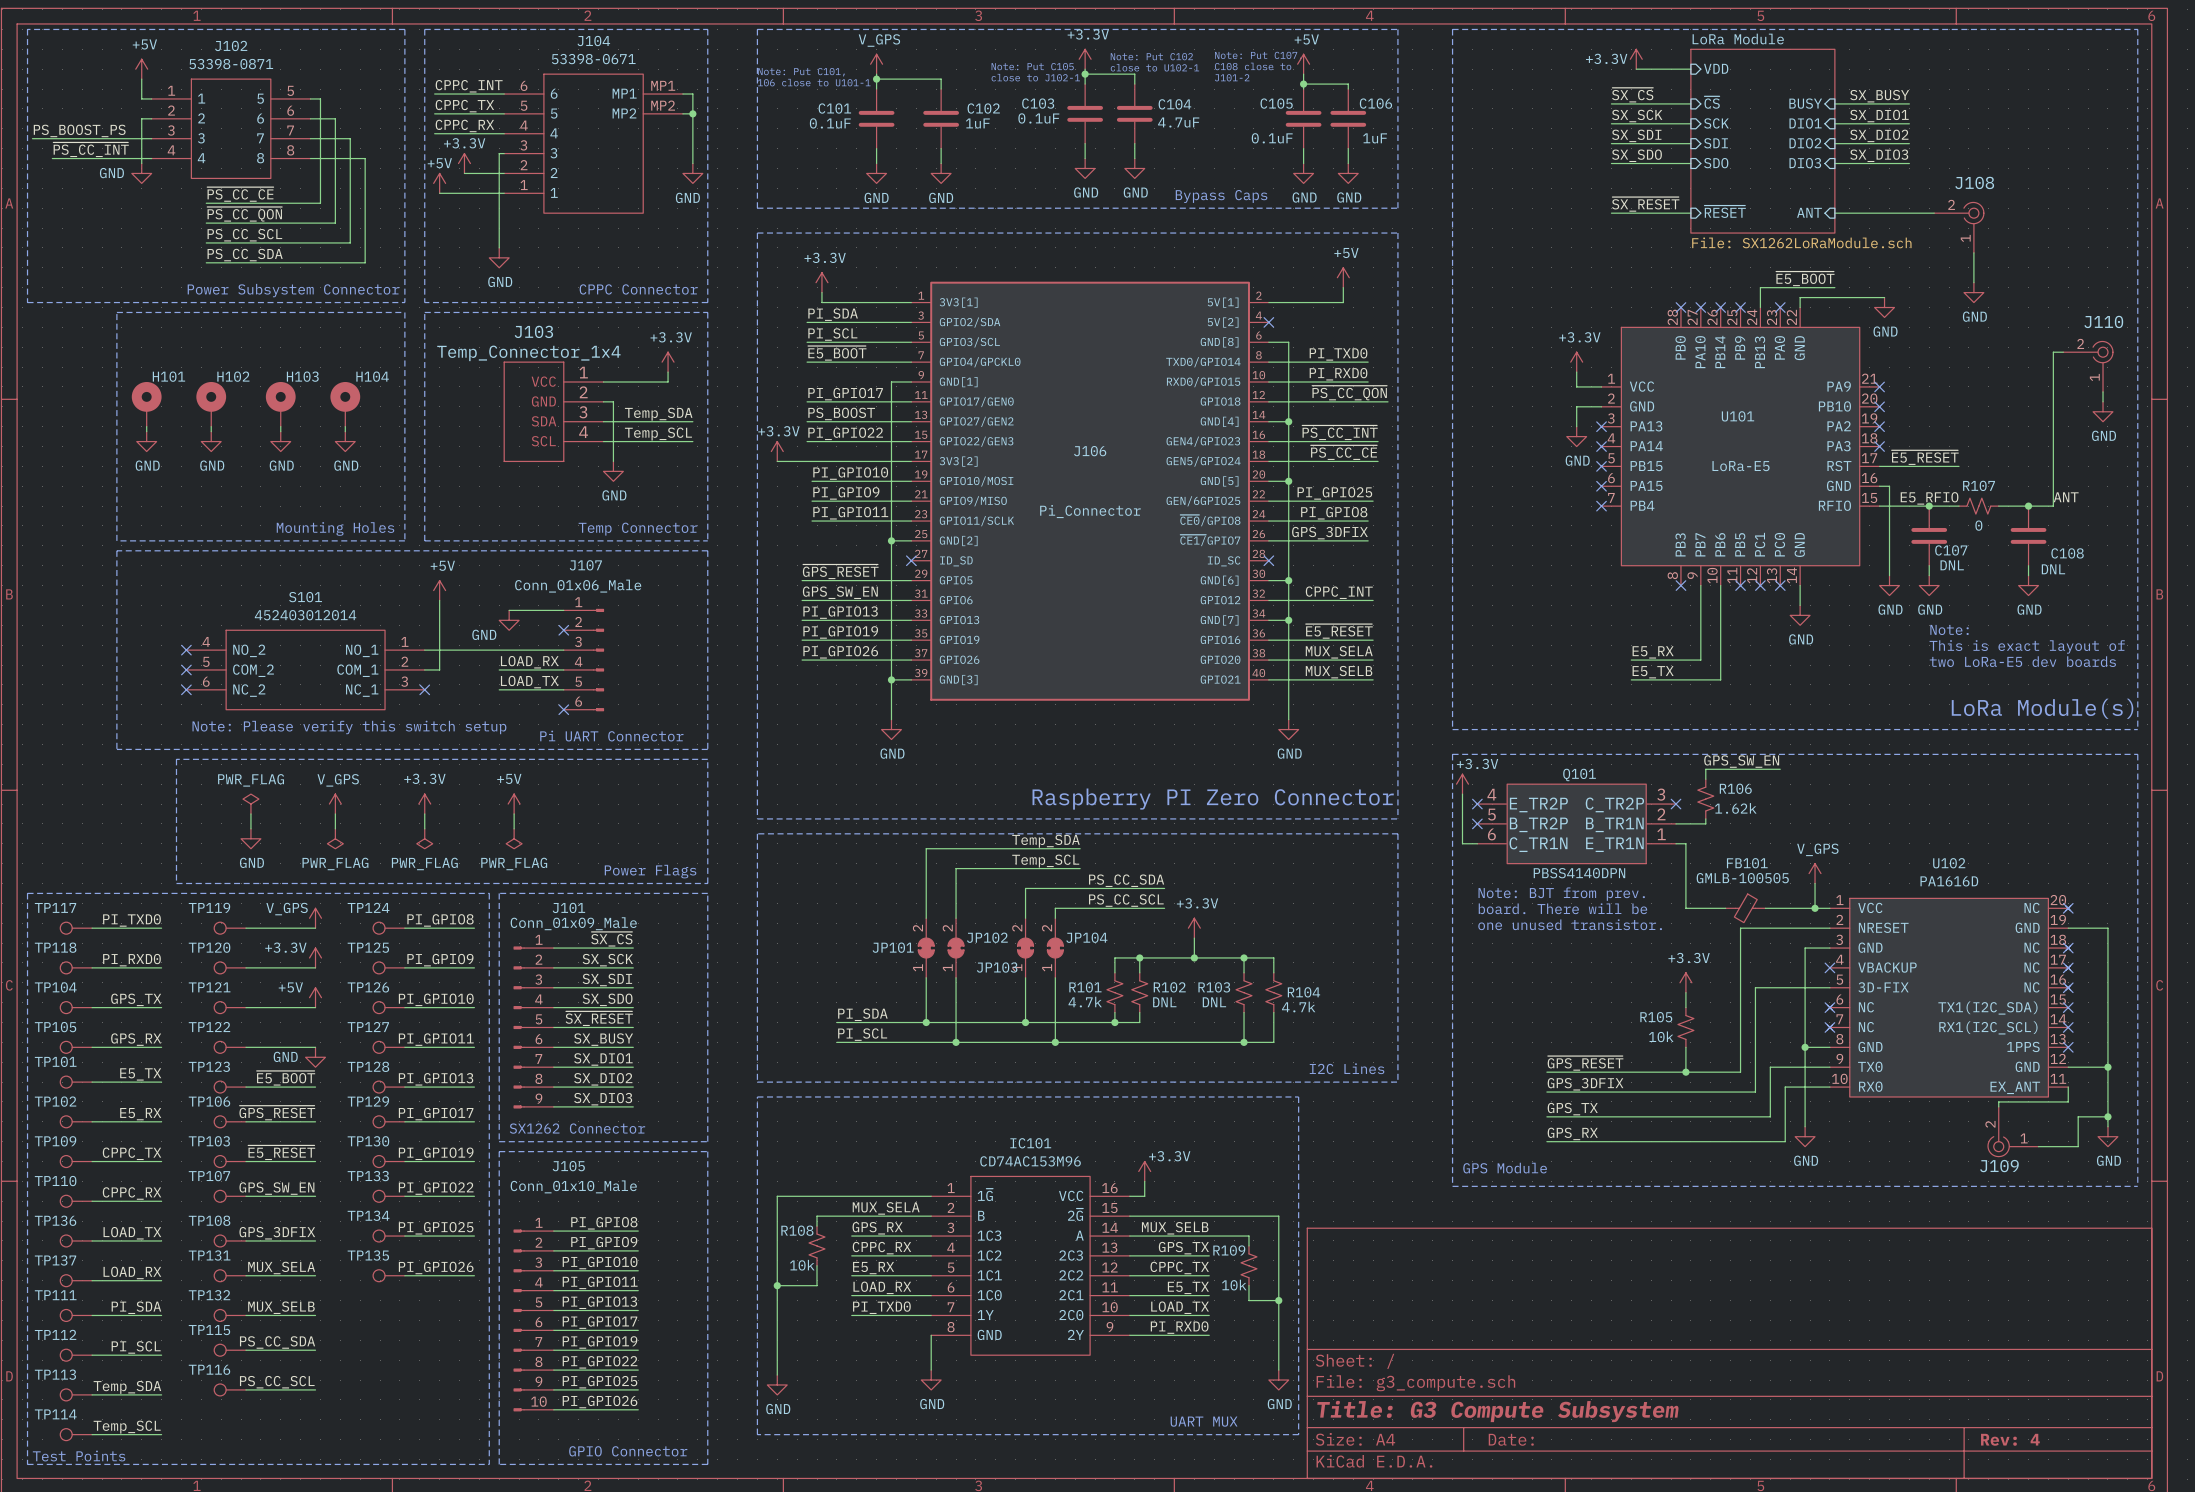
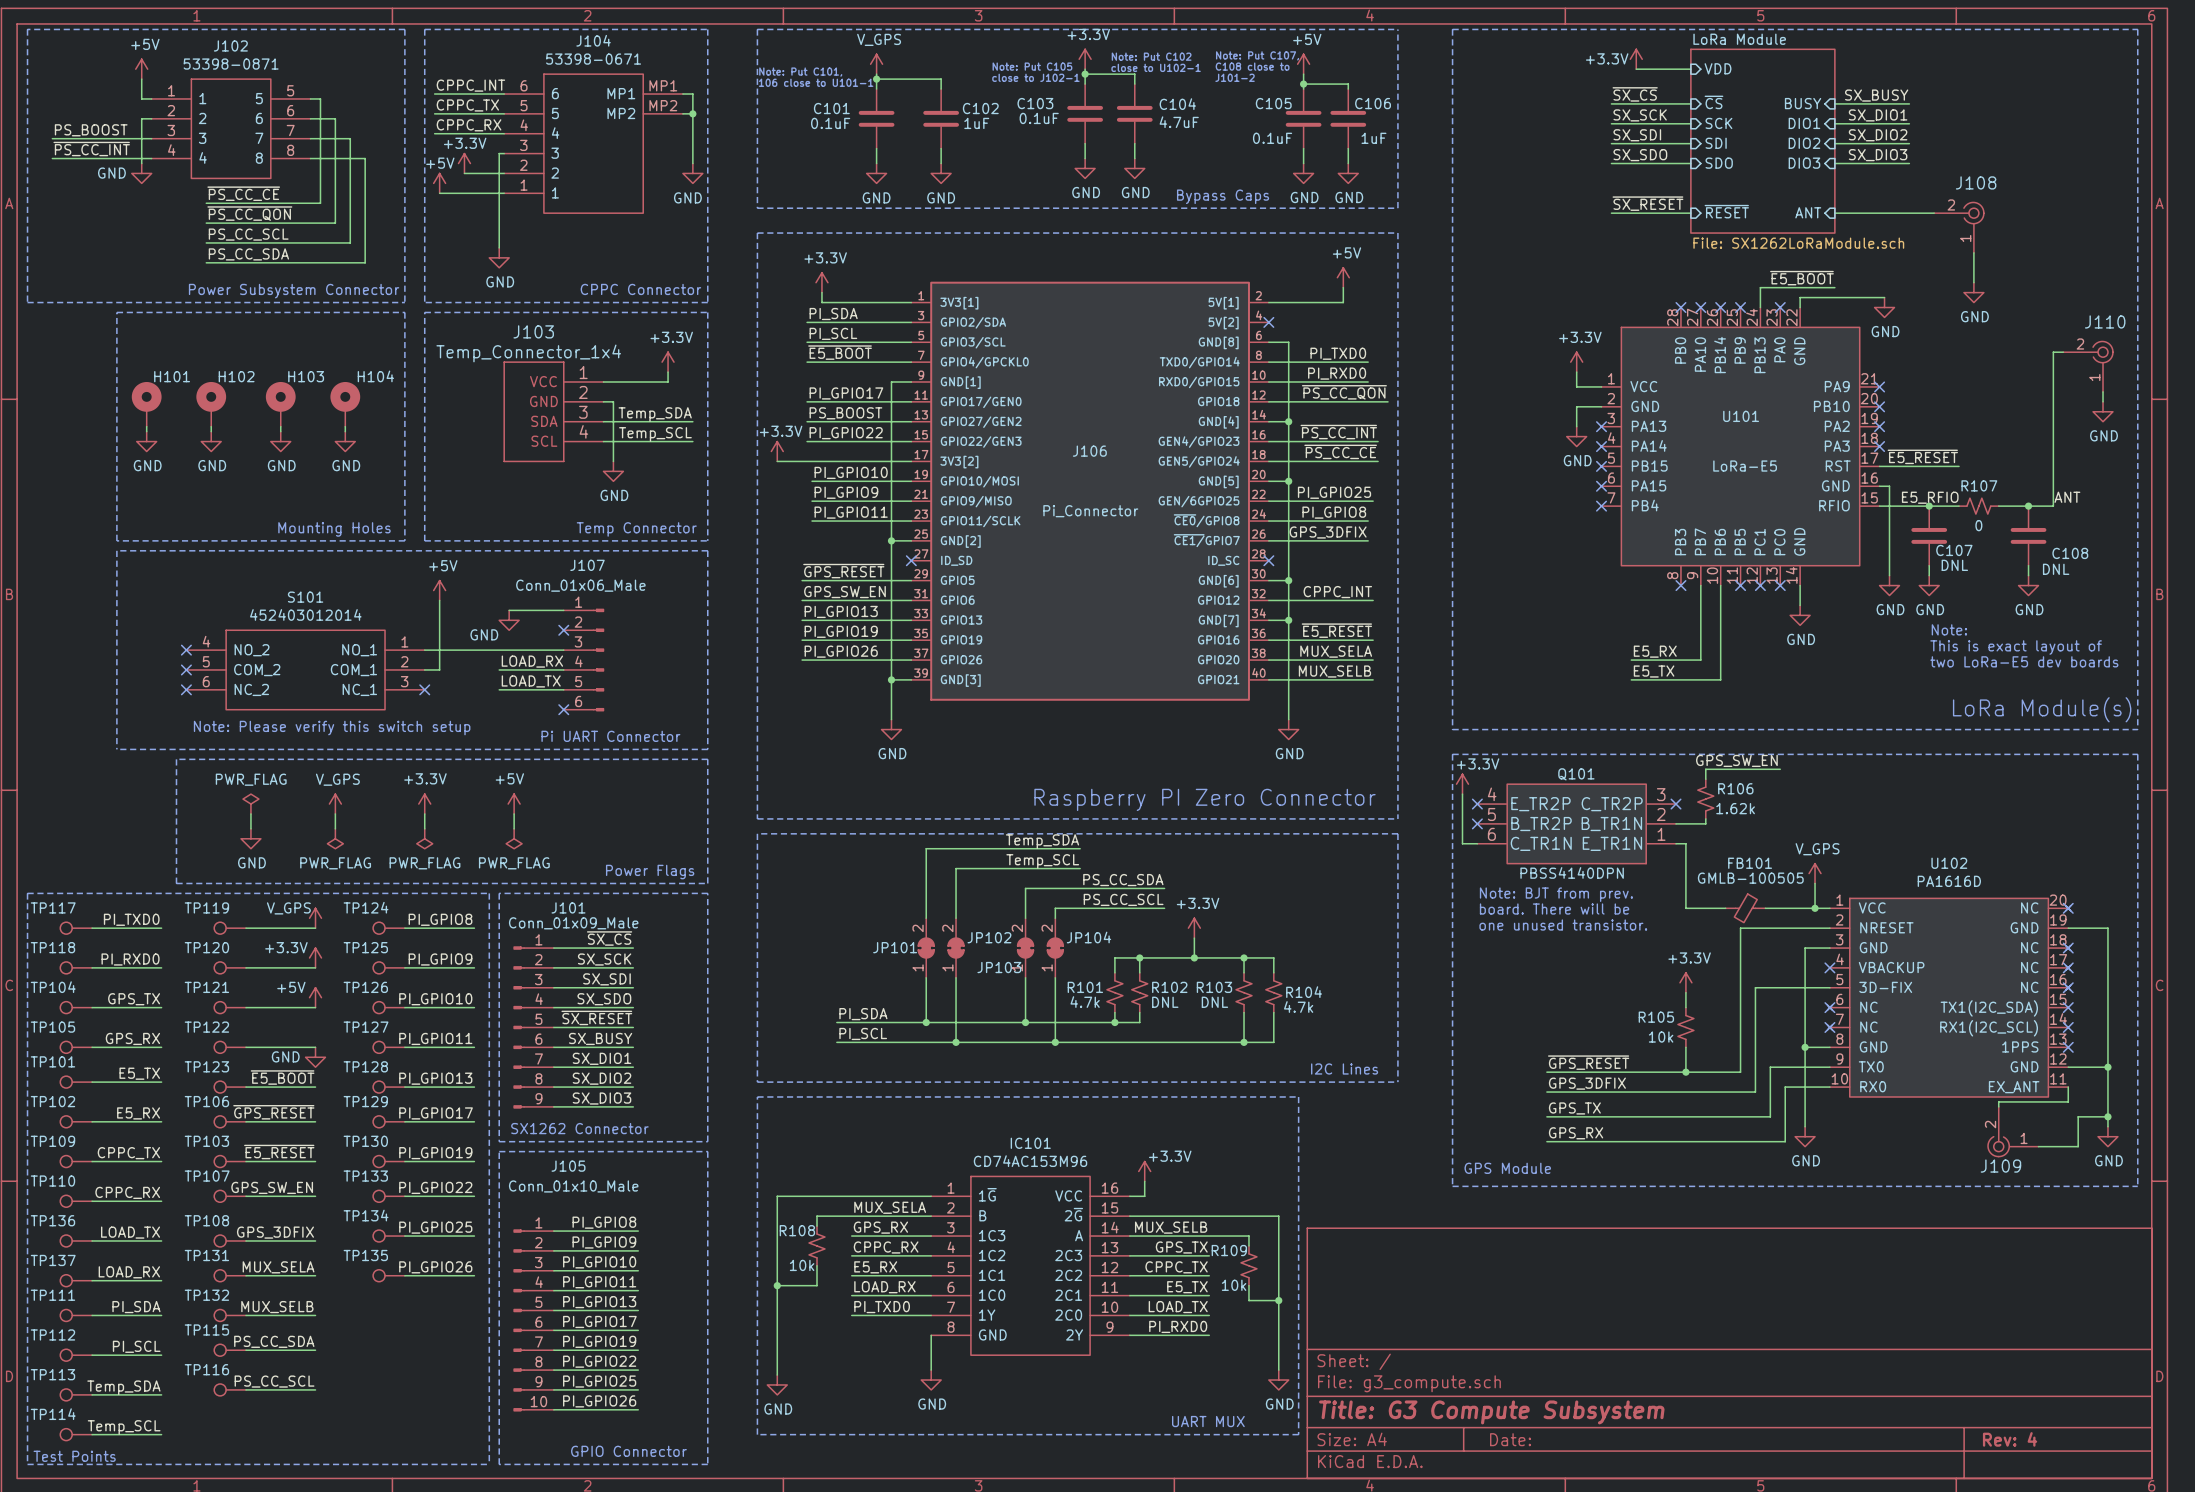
label: PS_BOOST_PS (79, 130) -> PS_BOOST (91, 130)
wire: (32, 138) (52, 138) -> none

